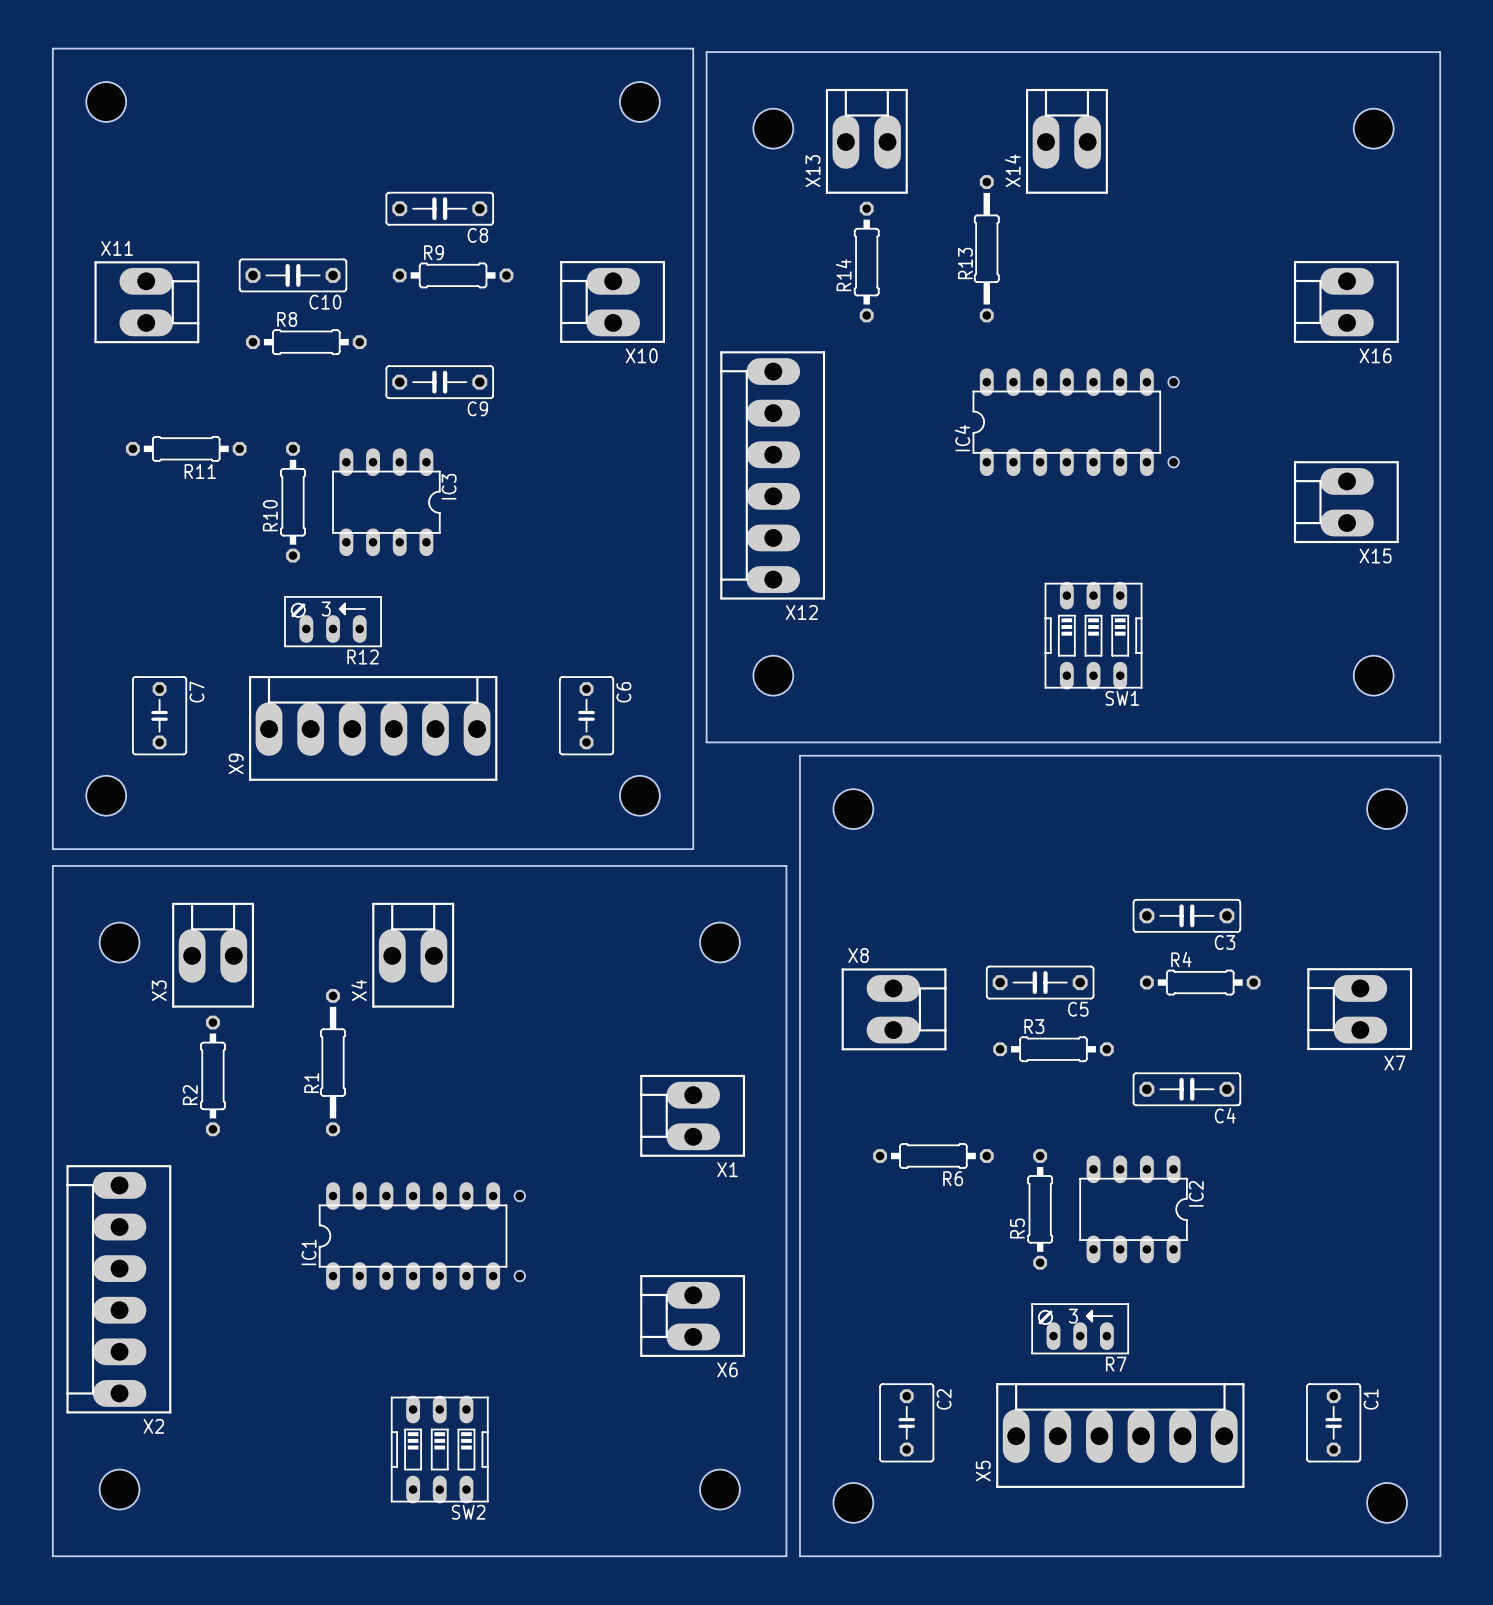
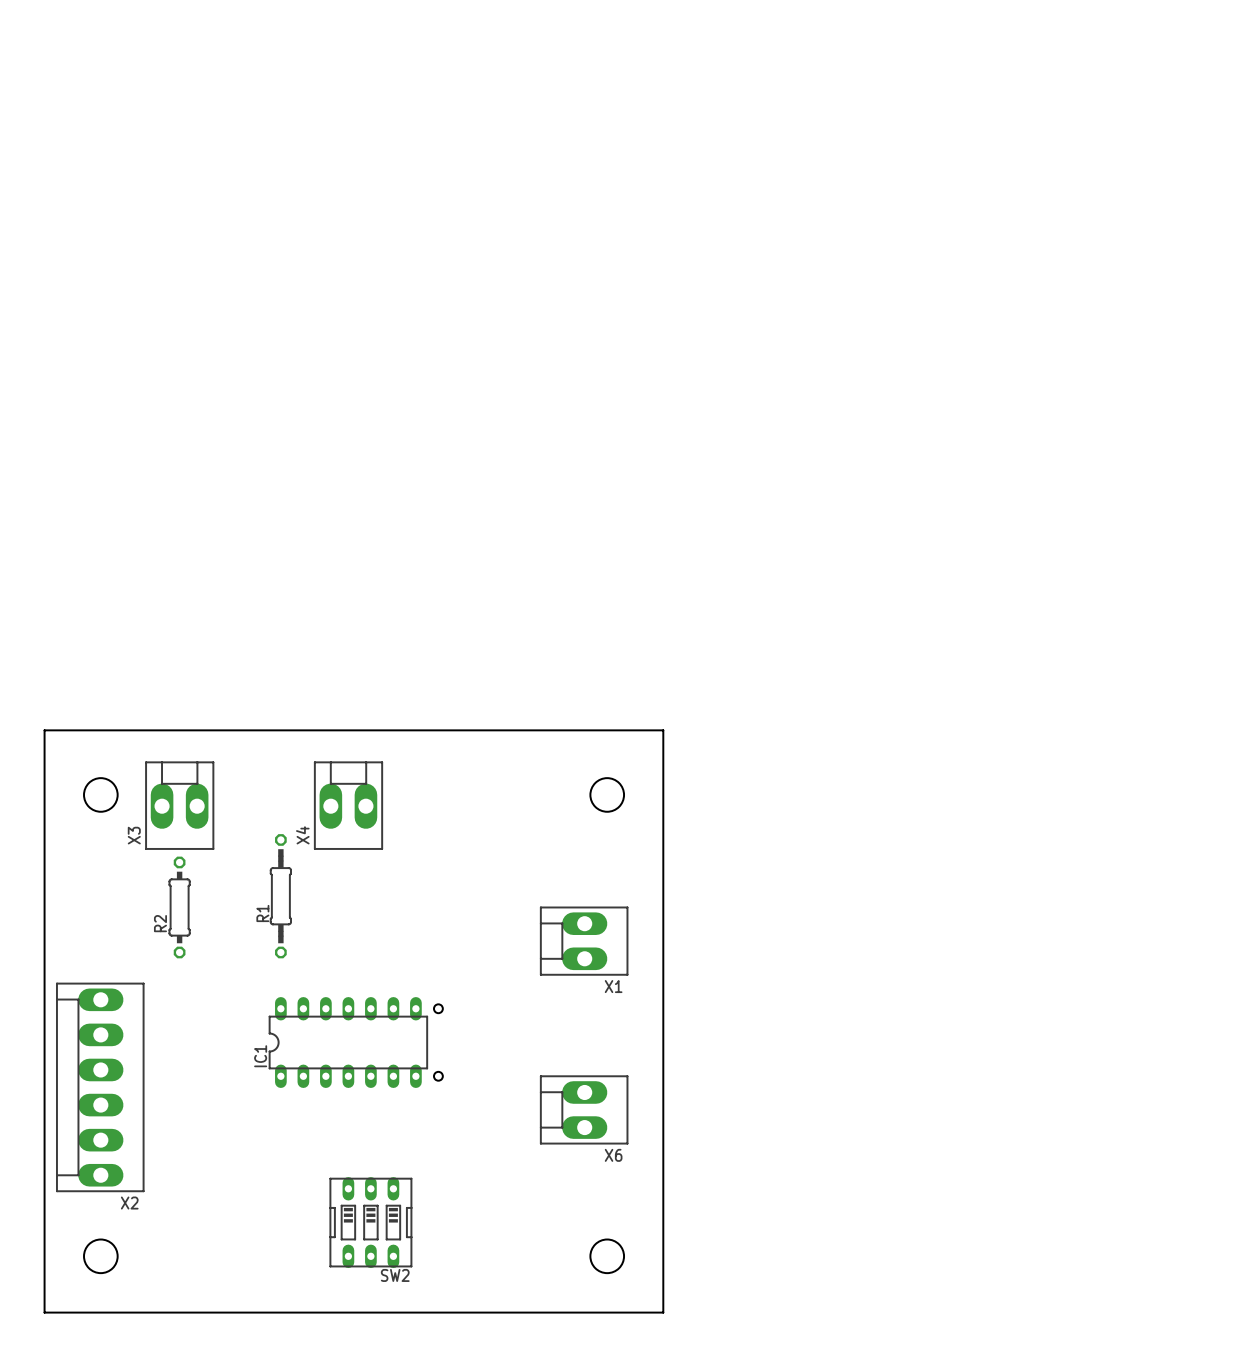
board edge: (52, 48) (52, 849) (693, 849) (693, 48) (52, 48) -> none
board edge: (706, 52) (1440, 52) (1440, 742) (706, 742) (706, 52) -> none
hole: (106, 101) -> none
hole: (639, 101) -> none
hole: (773, 128) -> none
hole: (1373, 128) -> none
X13: (866, 141) -> none
X14: (1066, 141) -> none
C8: (439, 208) -> none
R13: (986, 248) -> none
R14: (866, 262) -> none
C10: (293, 275) -> none
R9: (453, 275) -> none
X10: (612, 301) -> none
X16: (1346, 301) -> none
X11: (146, 302) -> none
R8: (306, 342) -> none
C9: (439, 382) -> none
hole: (1173, 382) -> none
IC4: (1066, 422) -> none
R11: (186, 448) -> none
hole: (1173, 462) -> none
X12: (772, 475) -> none
R10: (293, 502) -> none
IC3: (386, 502) -> none
X15: (1346, 502) -> none
R12: (333, 621) -> none
SW1: (1093, 635) -> none
hole: (773, 675) -> none
hole: (1373, 675) -> none
C7: (159, 715) -> none
C6: (586, 715) -> none
X9: (373, 728) -> none
board edge: (799, 755) (1440, 755) (1440, 1556) (799, 1556) (799, 755) -> none
hole: (106, 795) -> none
hole: (639, 795) -> none
hole: (853, 809) -> none
hole: (1387, 809) -> none
C3: (1186, 915) -> none
C5: (1040, 982) -> none
R4: (1200, 982) -> none
X8: (894, 1009) -> none
X7: (1359, 1009) -> none
R3: (1053, 1049) -> none
C4: (1186, 1089) -> none
R6: (933, 1156) -> none
R5: (1040, 1209) -> none
IC2: (1133, 1209) -> none
R7: (1080, 1328) -> none
C2: (906, 1422) -> none
C1: (1333, 1422) -> none
X5: (1120, 1435) -> none
hole: (853, 1502) -> none
hole: (1387, 1502) -> none

